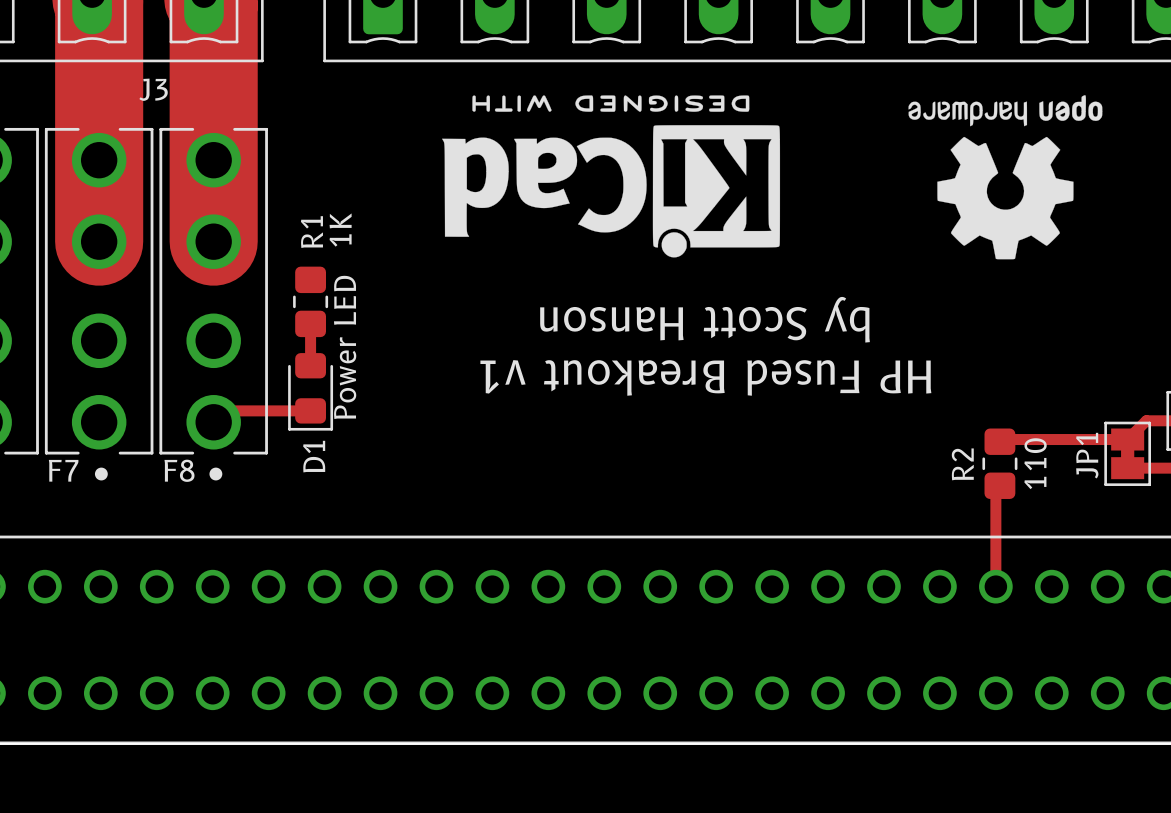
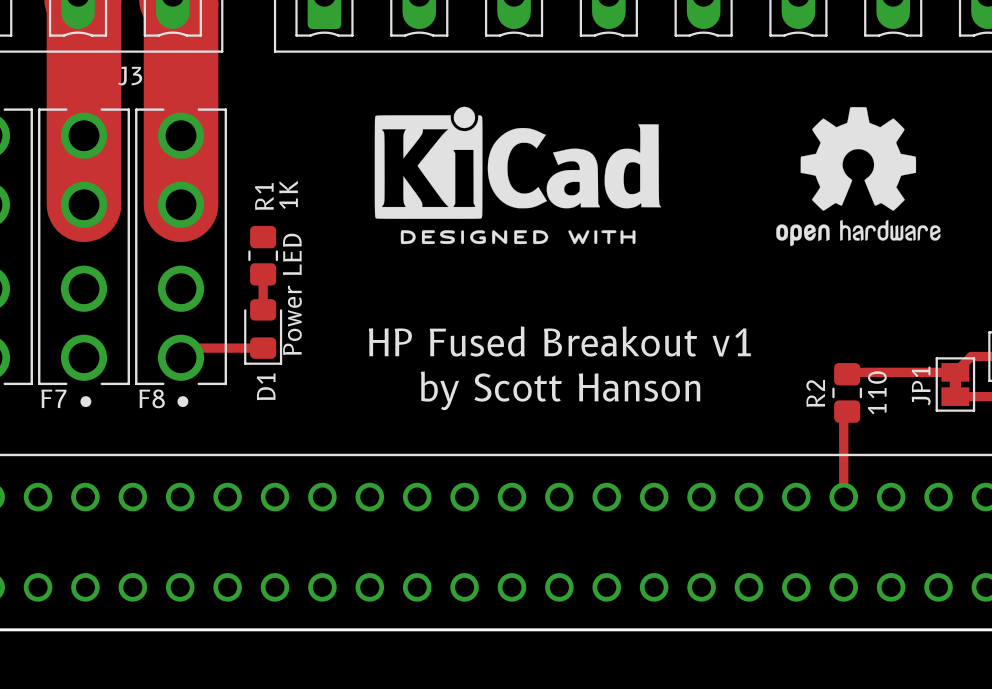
drawing: [442, 95, 781, 258] -> none
drawing: [908, 95, 1103, 260] -> none
drawing: none -> [374, 106, 662, 245]
drawing: none -> [776, 107, 941, 247]
text rotation: 0° (705, 319) -> 180° (560, 390)
text rotation: 0° (705, 377) -> 180° (559, 341)

